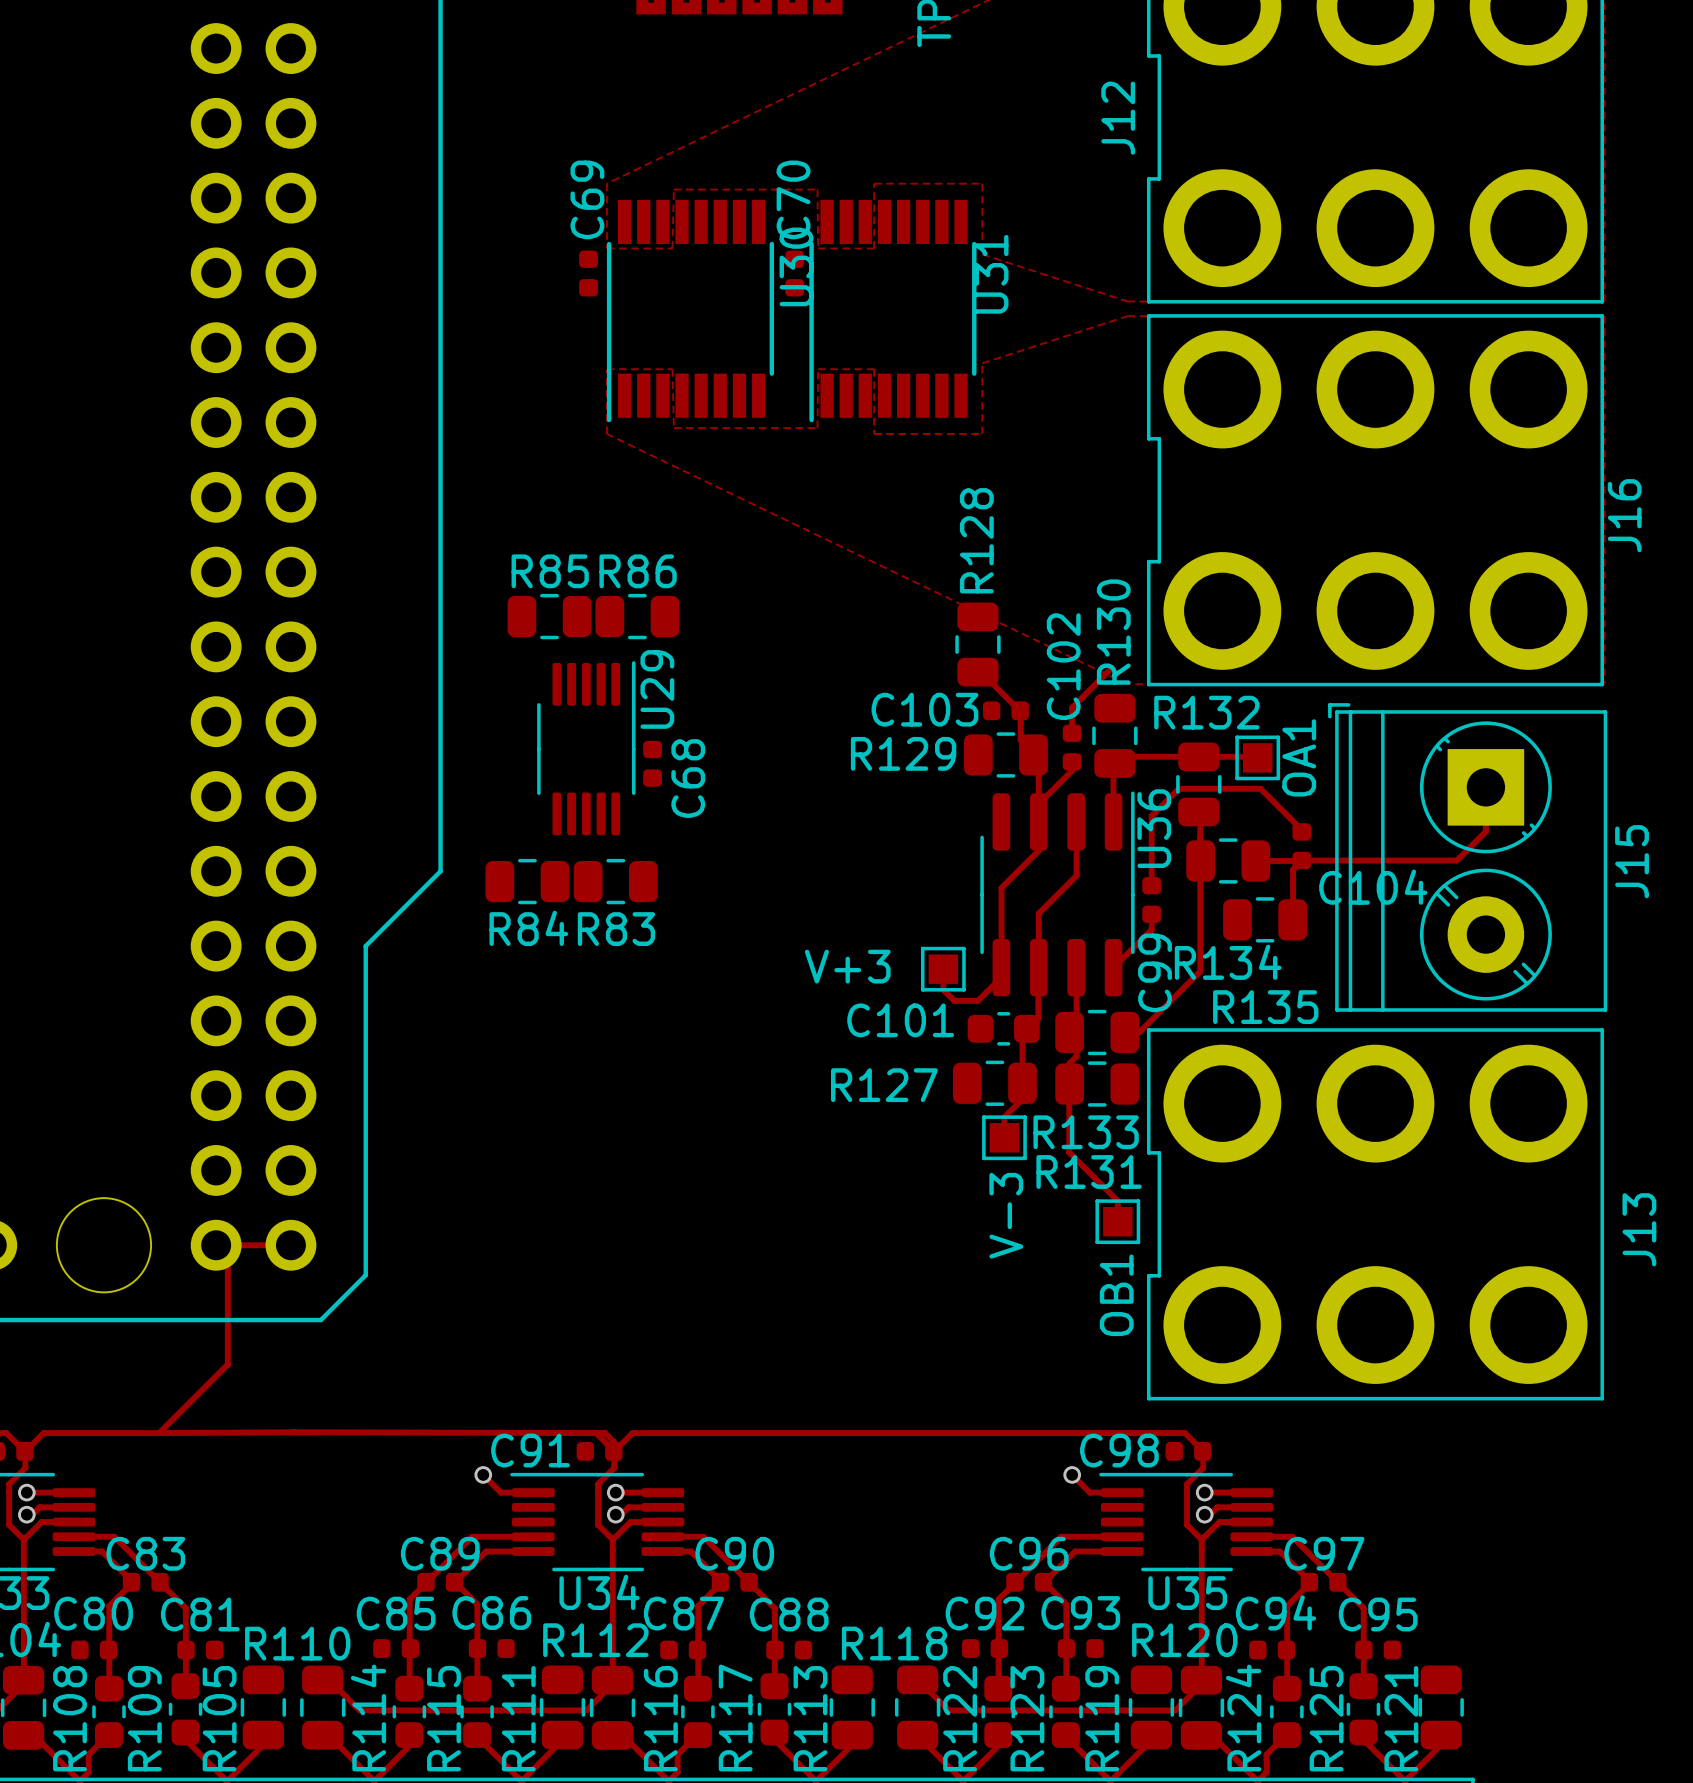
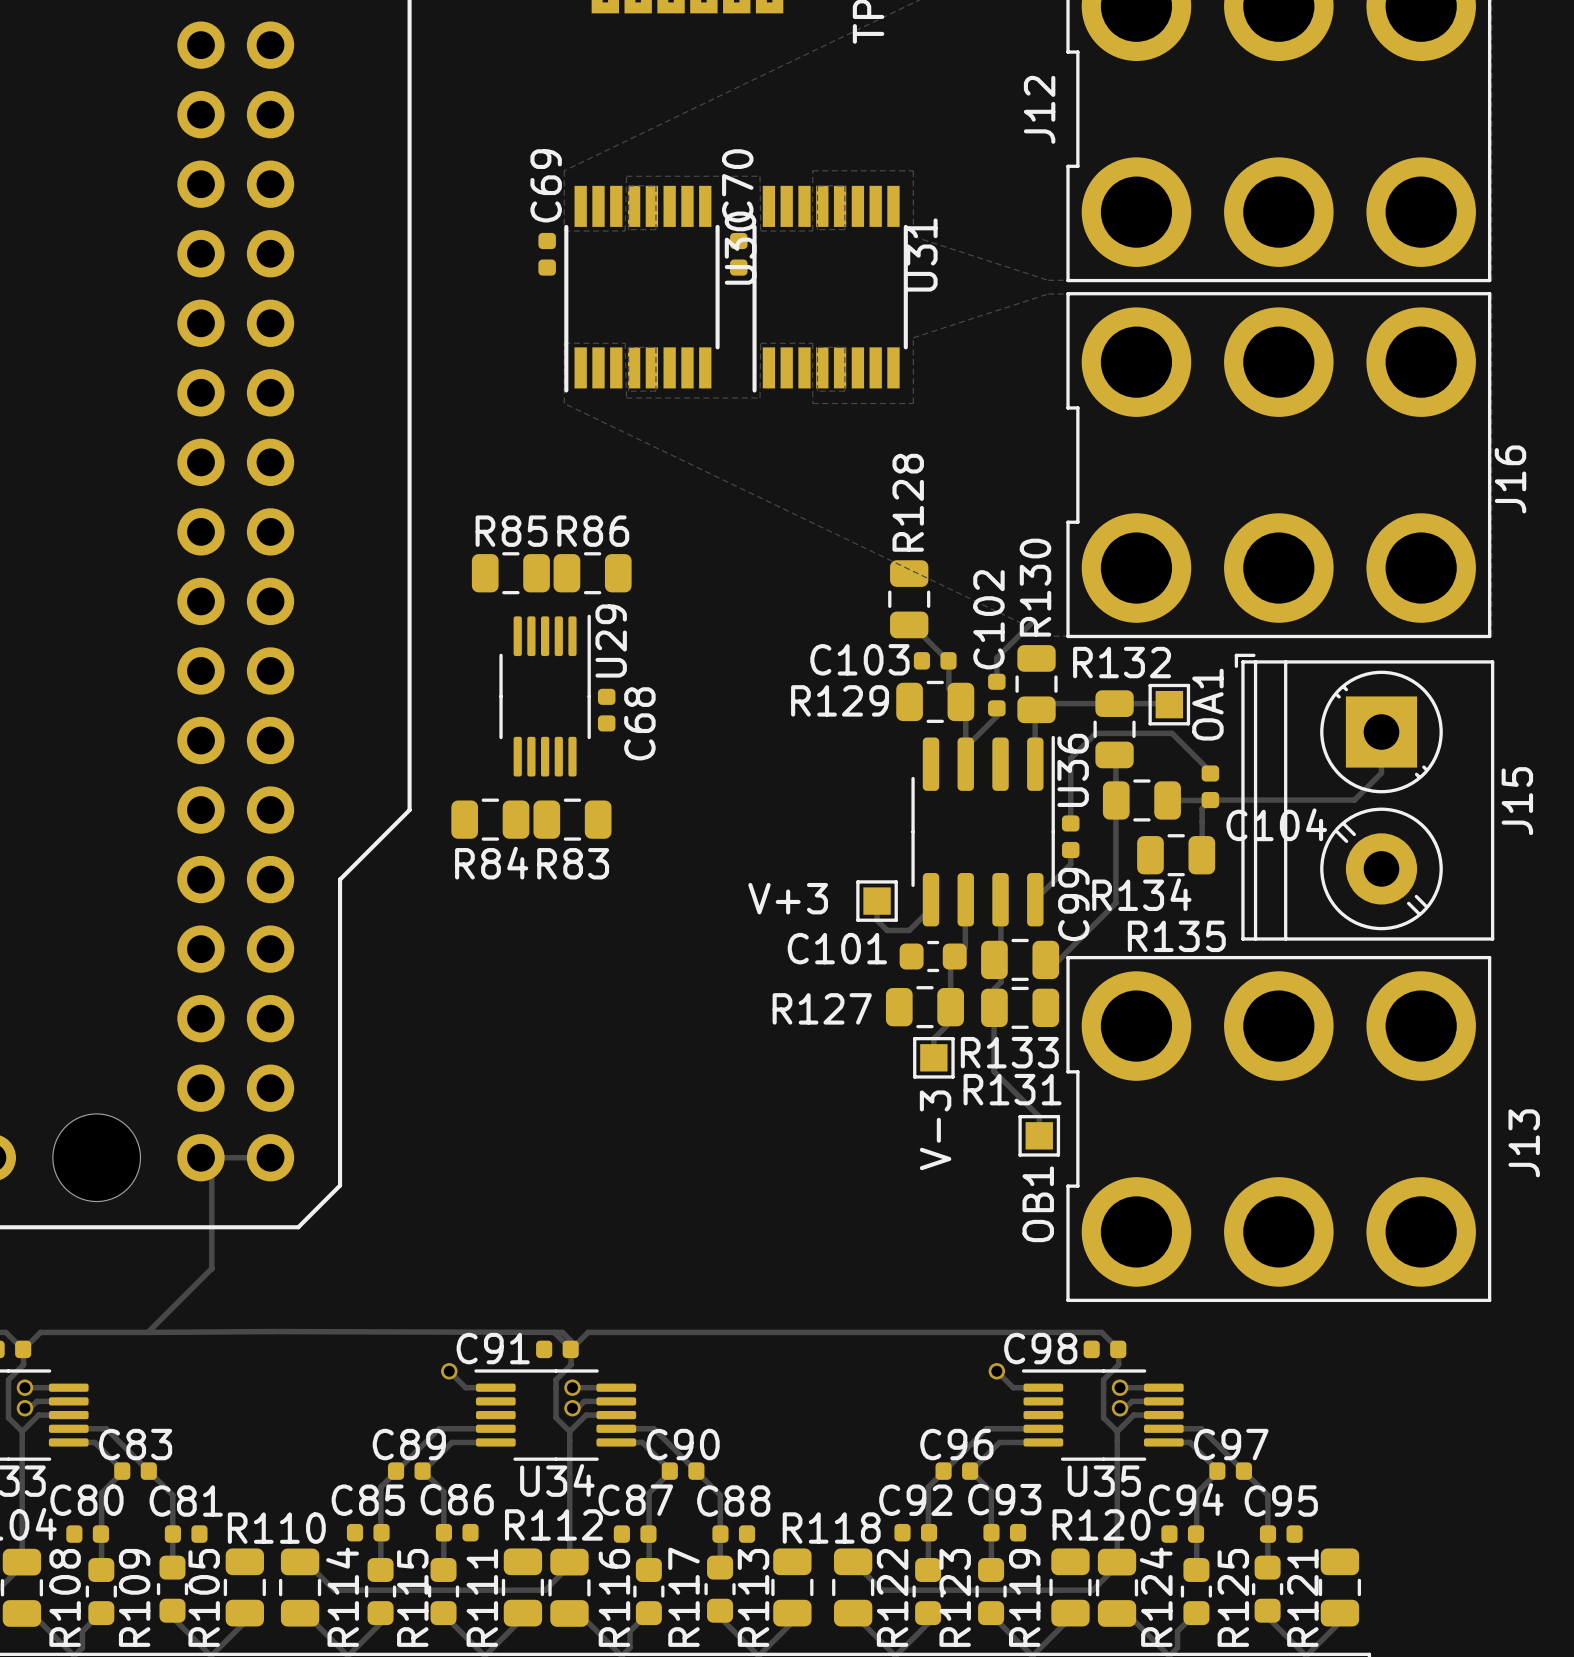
zone outline: none -> (628, 185) (655, 185) (655, 229) (628, 229) (628, 185)
zone outline: none -> (817, 185) (817, 229) (844, 229) (844, 185) (817, 185)
zone outline: none -> (628, 347) (655, 347) (655, 391) (628, 391) (628, 347)
zone outline: none -> (817, 347) (817, 391) (844, 391) (844, 347) (817, 347)
track: (1038, 821) (1038, 850) (1001, 887) (1001, 969) -> none
track: (1076, 822) (1076, 875) (1038, 913) (1038, 967) -> none

